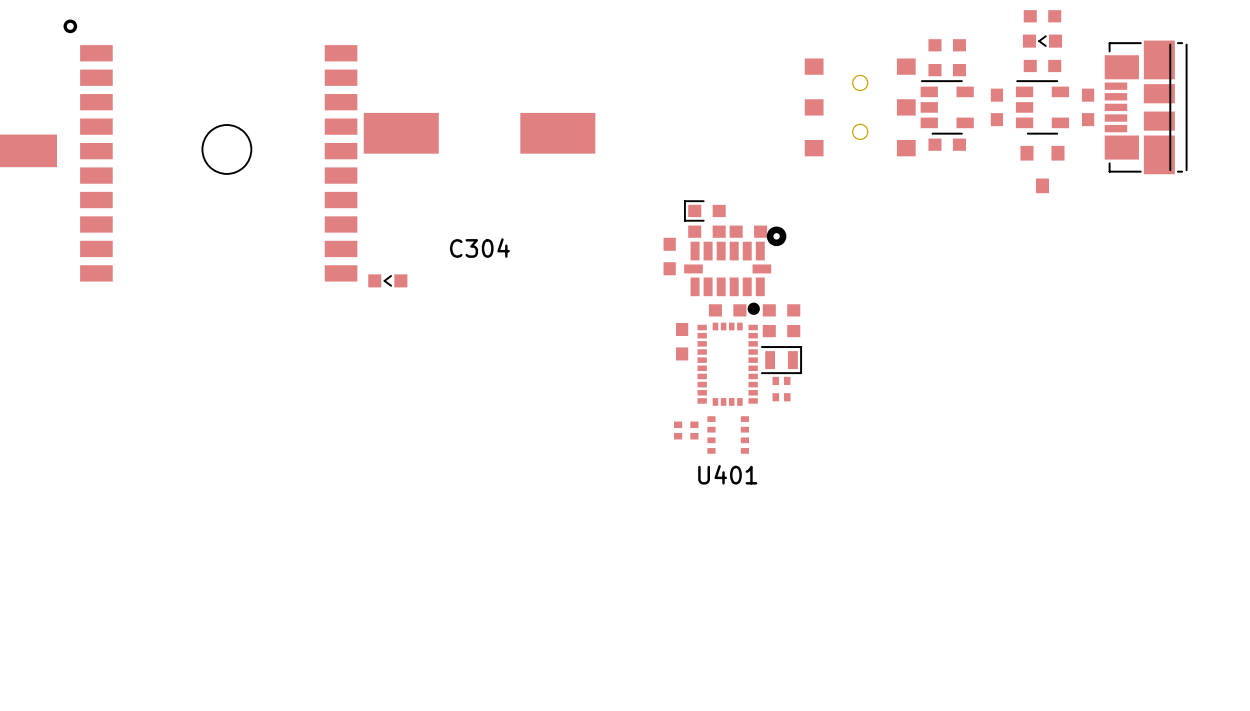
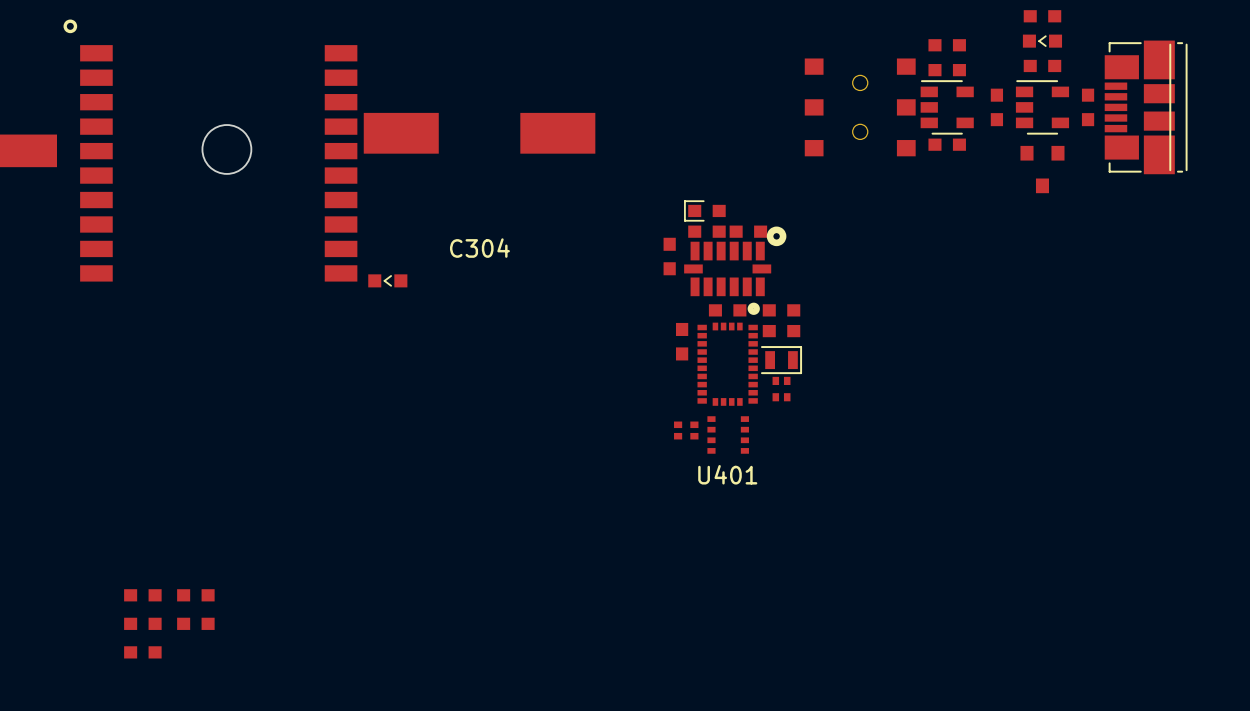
part: none -> (142, 595)
part: none -> (195, 595)
part: none -> (142, 623)
part: none -> (195, 623)
part: none -> (142, 652)

